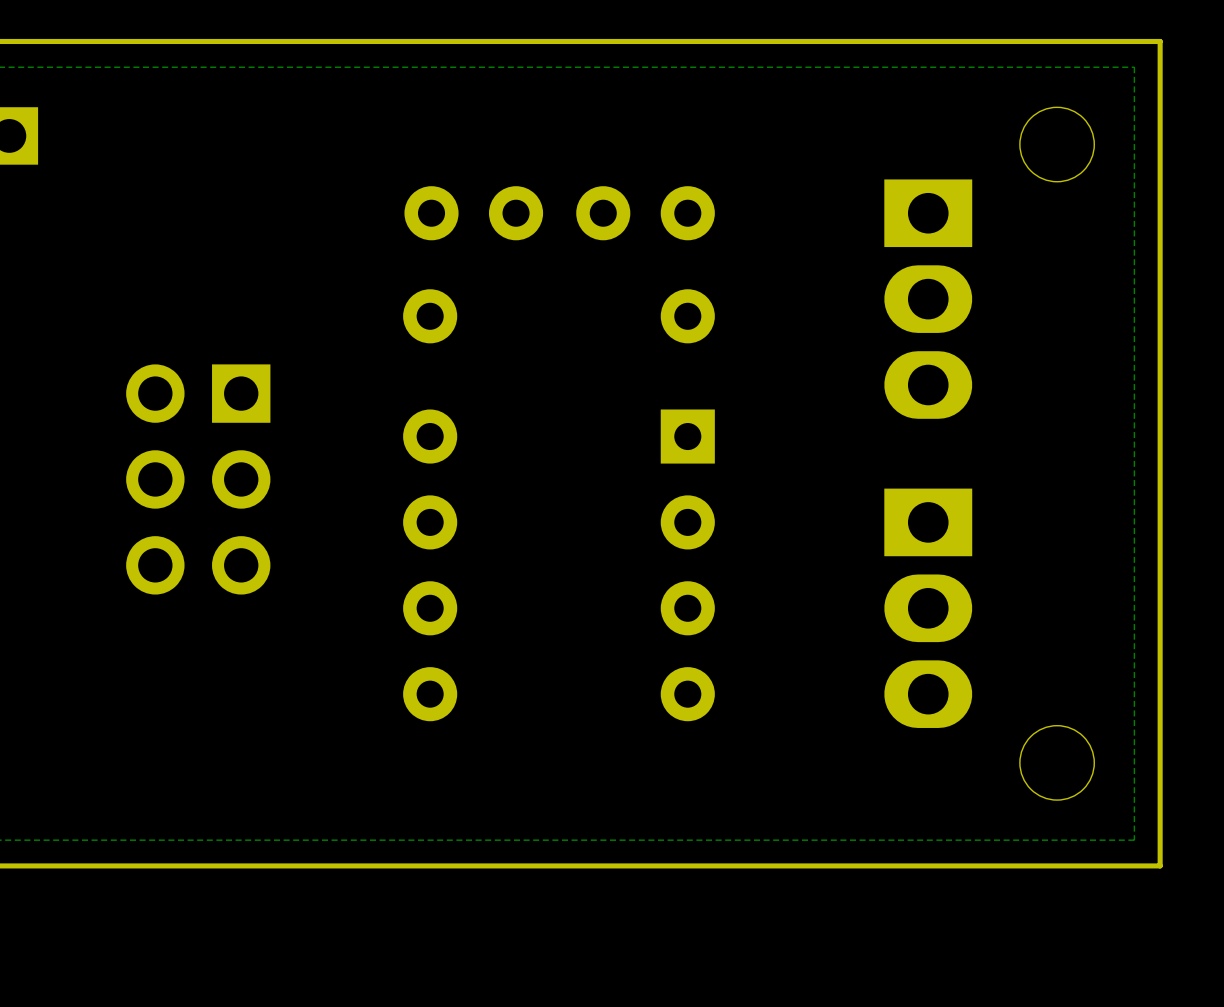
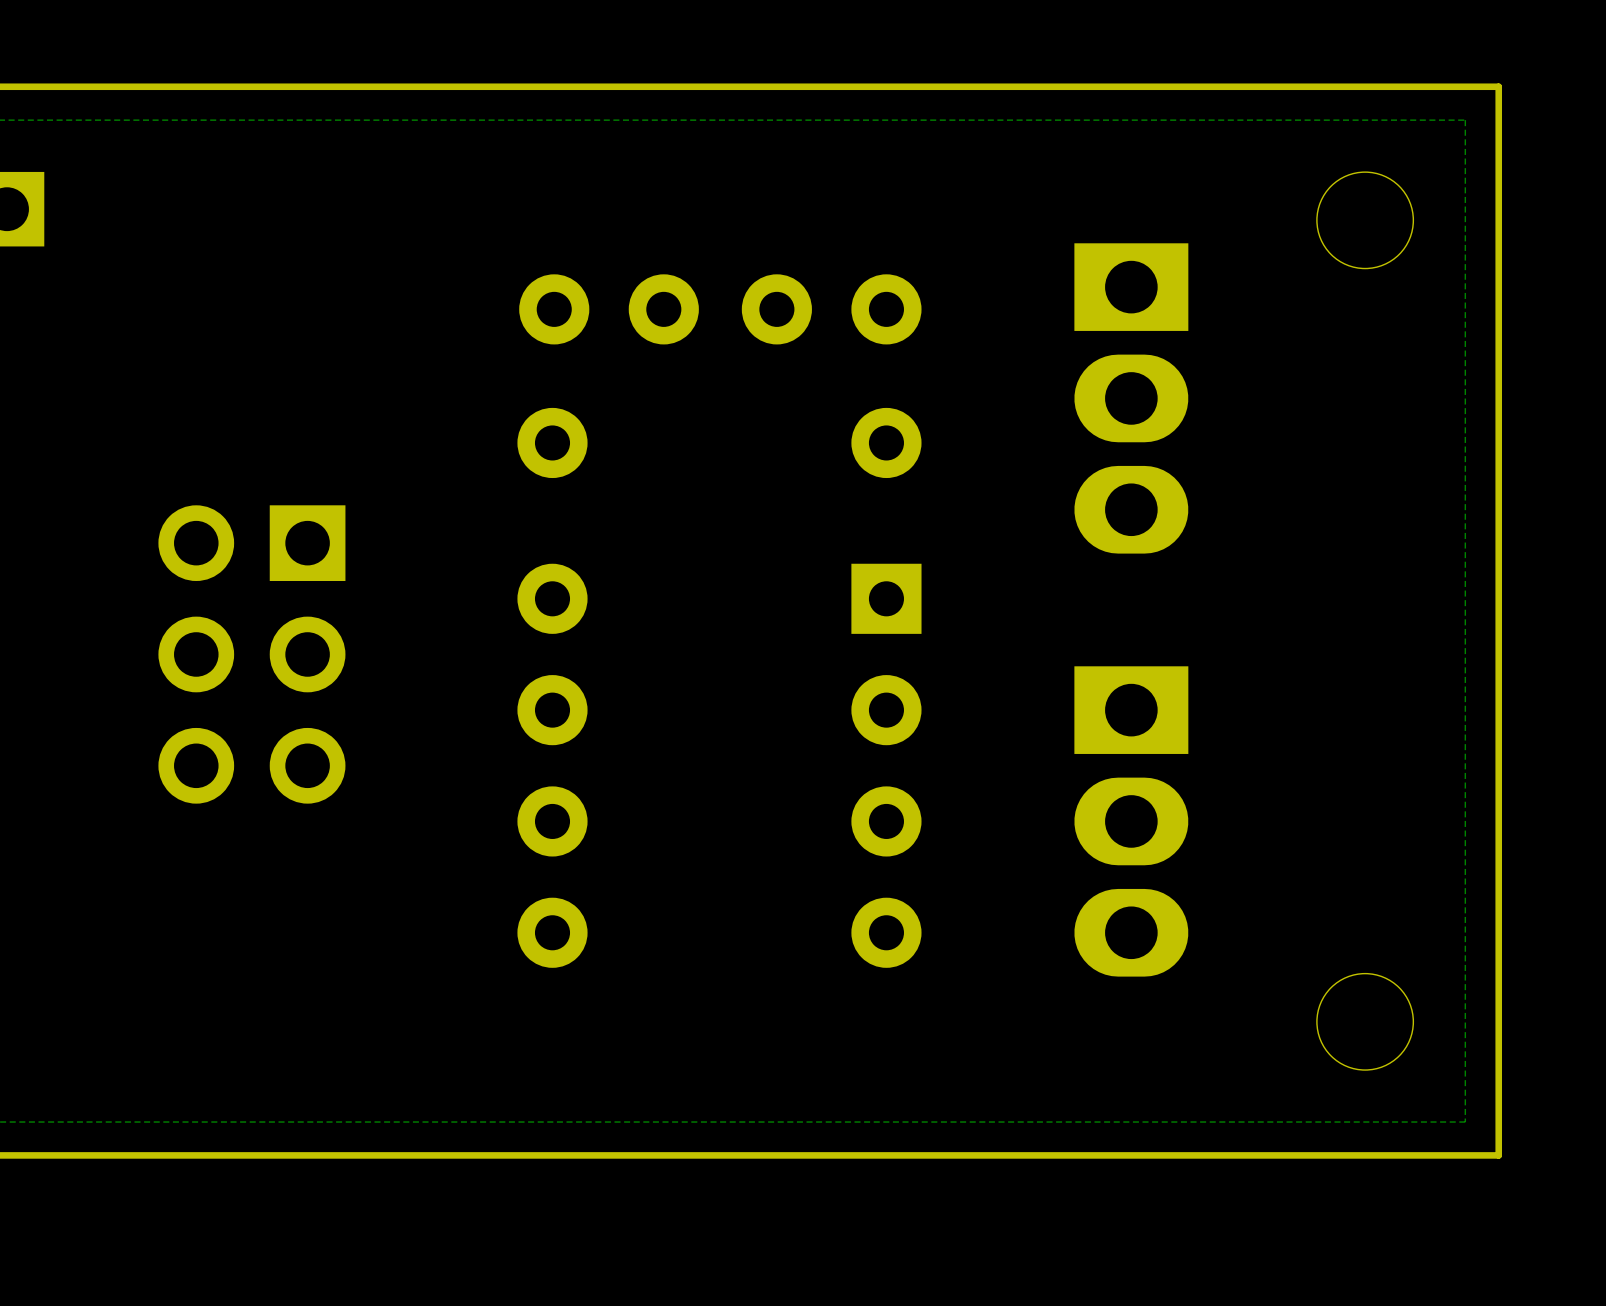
part position: (928, 299) -> (1131, 398)
part position: (928, 608) -> (1131, 821)

